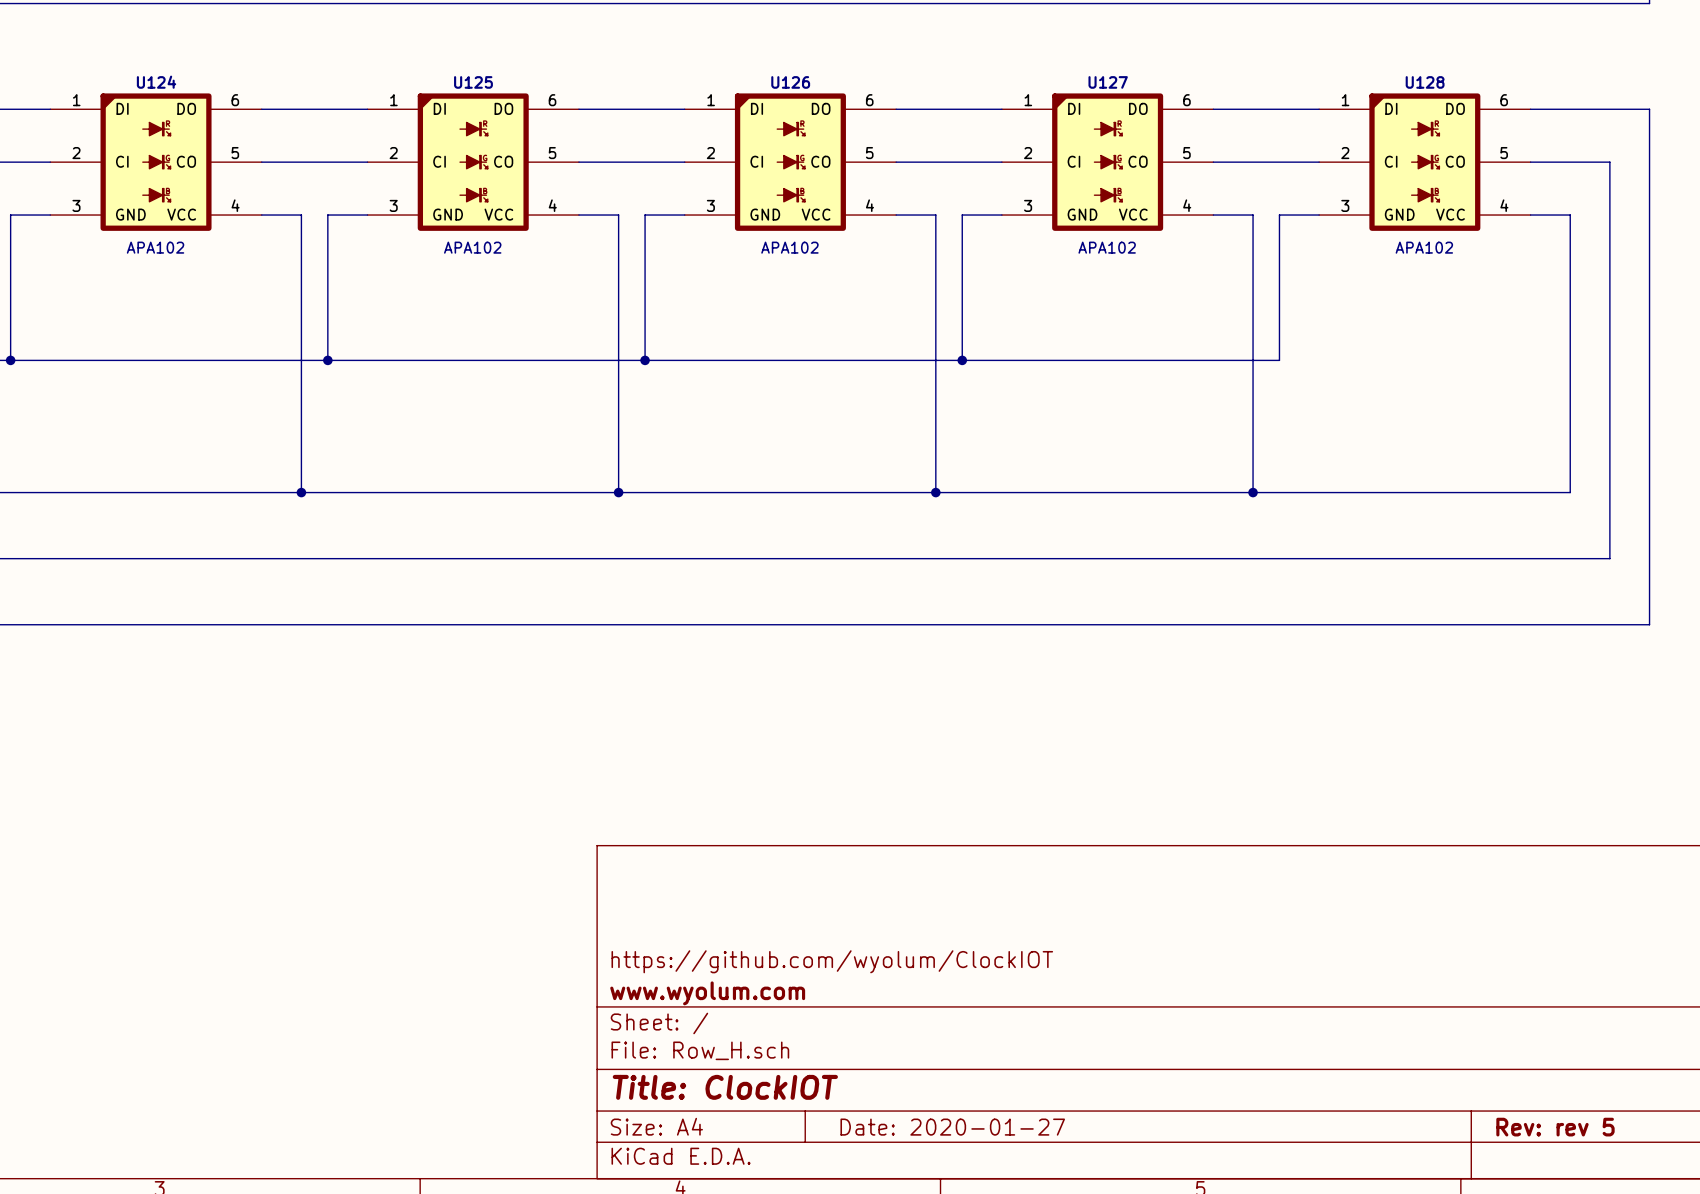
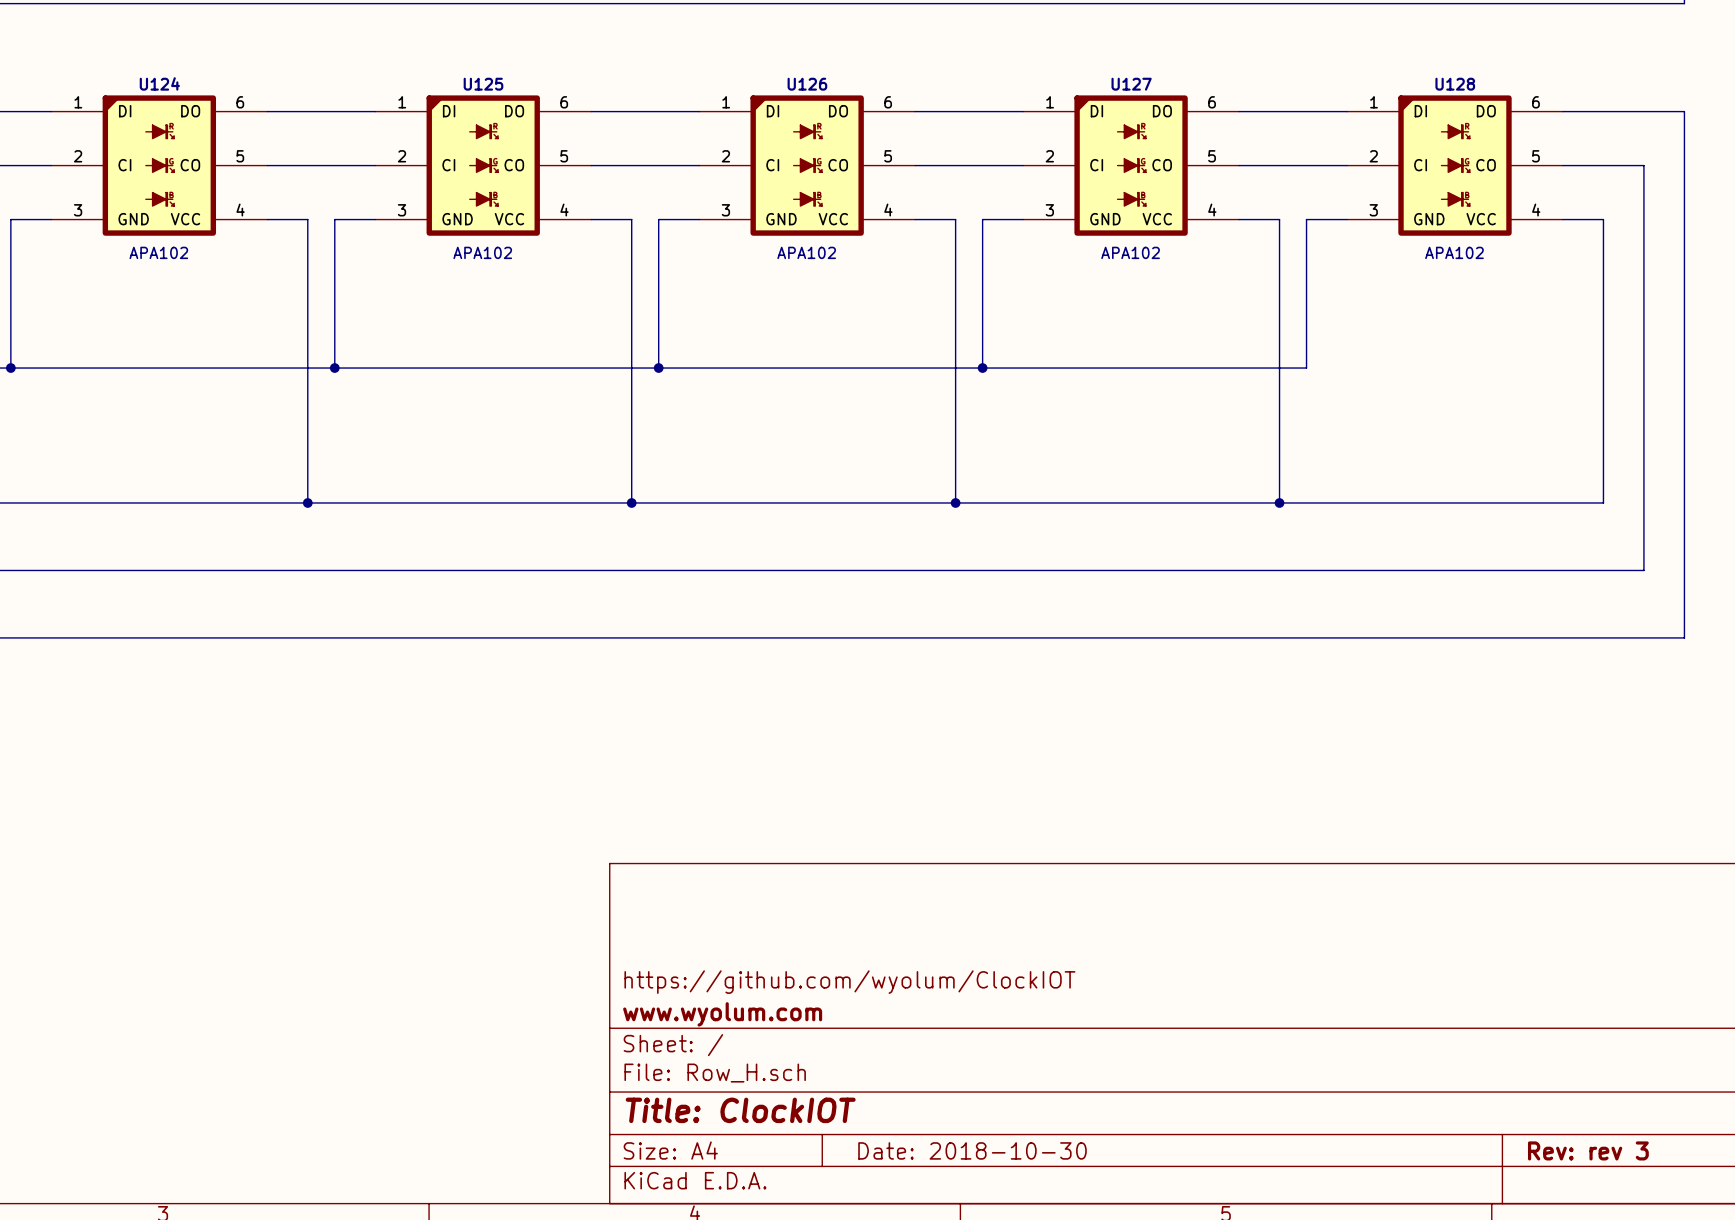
title block: Date: 2020-01-27 (952, 1127) -> Date: 2018-10-30 (972, 1150)
title block: Rev: rev 5 (1555, 1127) -> Rev: rev 3 (1588, 1150)

